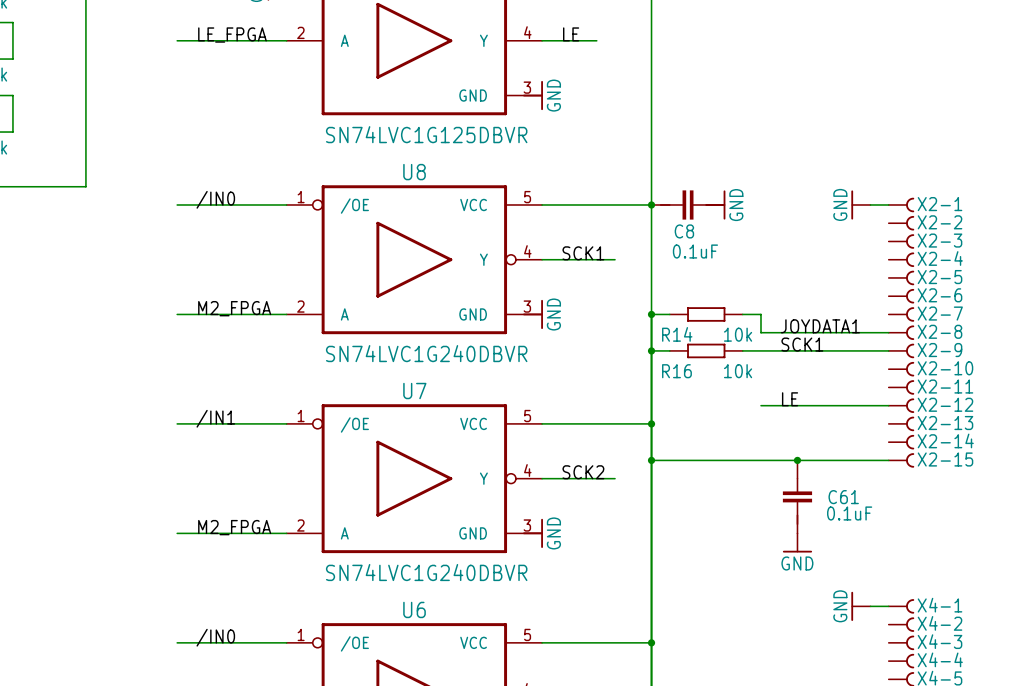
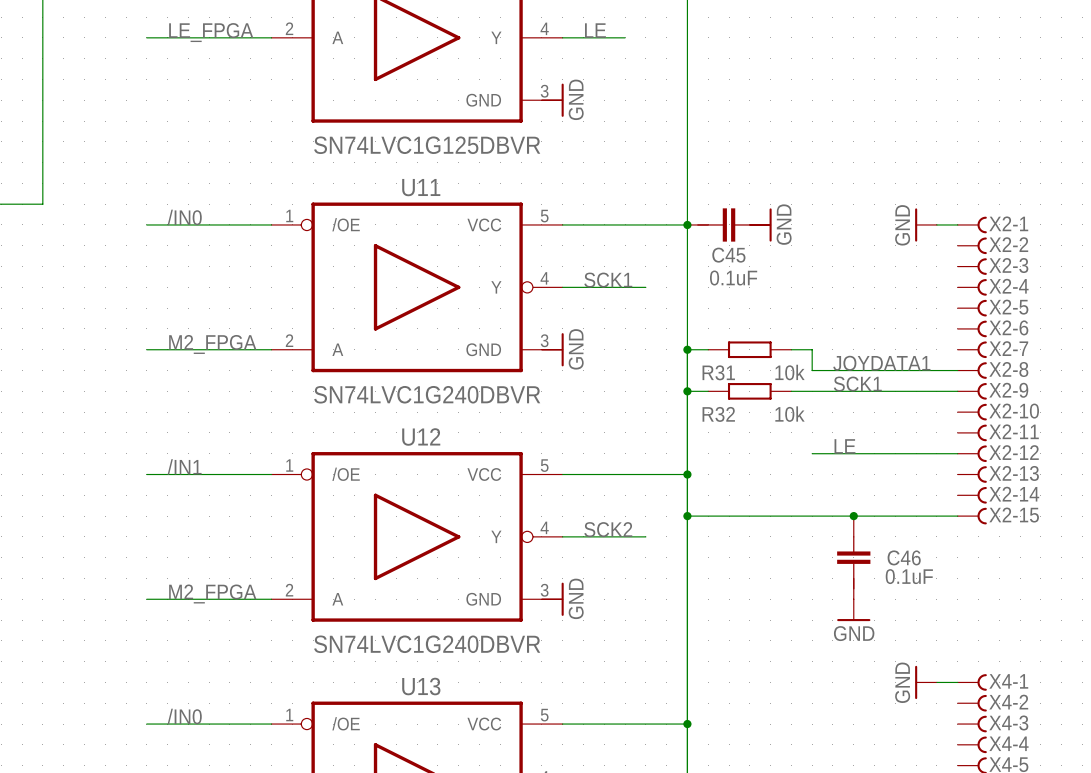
U8 name: U8 (414, 172) -> U11 (421, 187)
C8 name: C8 (684, 231) -> C45 (728, 255)
R14 name: R14 (677, 334) -> R31 (718, 372)
R16 name: R16 (676, 371) -> R32 (718, 414)
U7 name: U7 (414, 391) -> U12 (421, 437)
C61 name: C61 (843, 497) -> C46 (904, 557)
U6 name: U6 (414, 609) -> U13 (421, 686)

